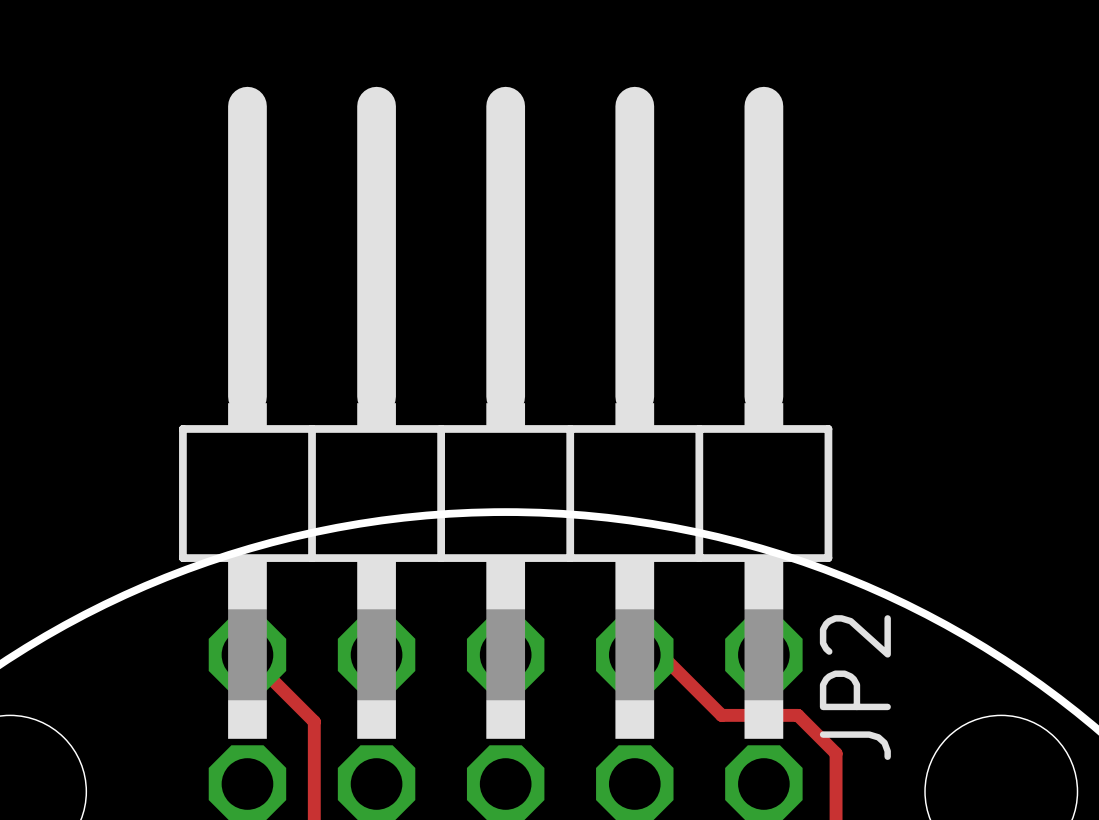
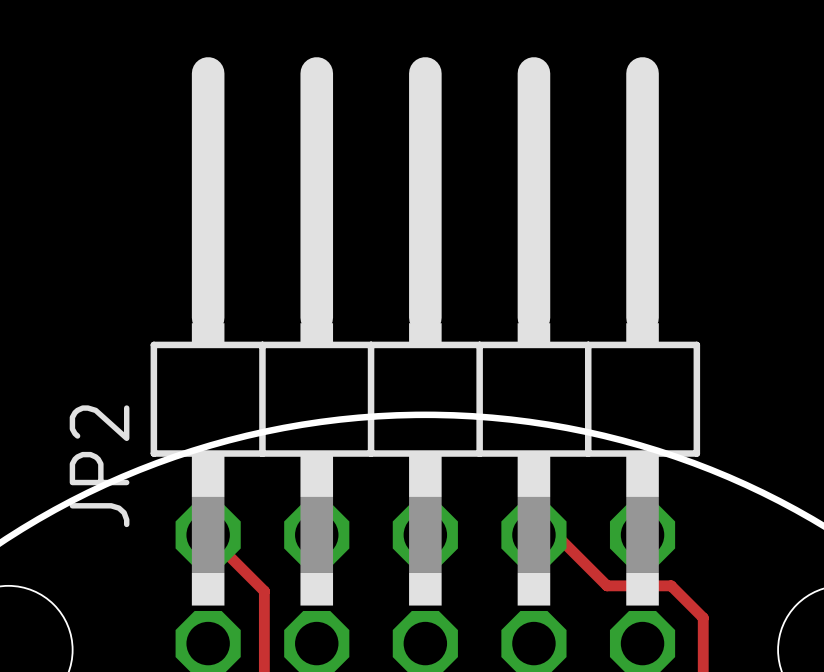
JP2 name position: JP2 (855, 687) -> JP2 (99, 466)

